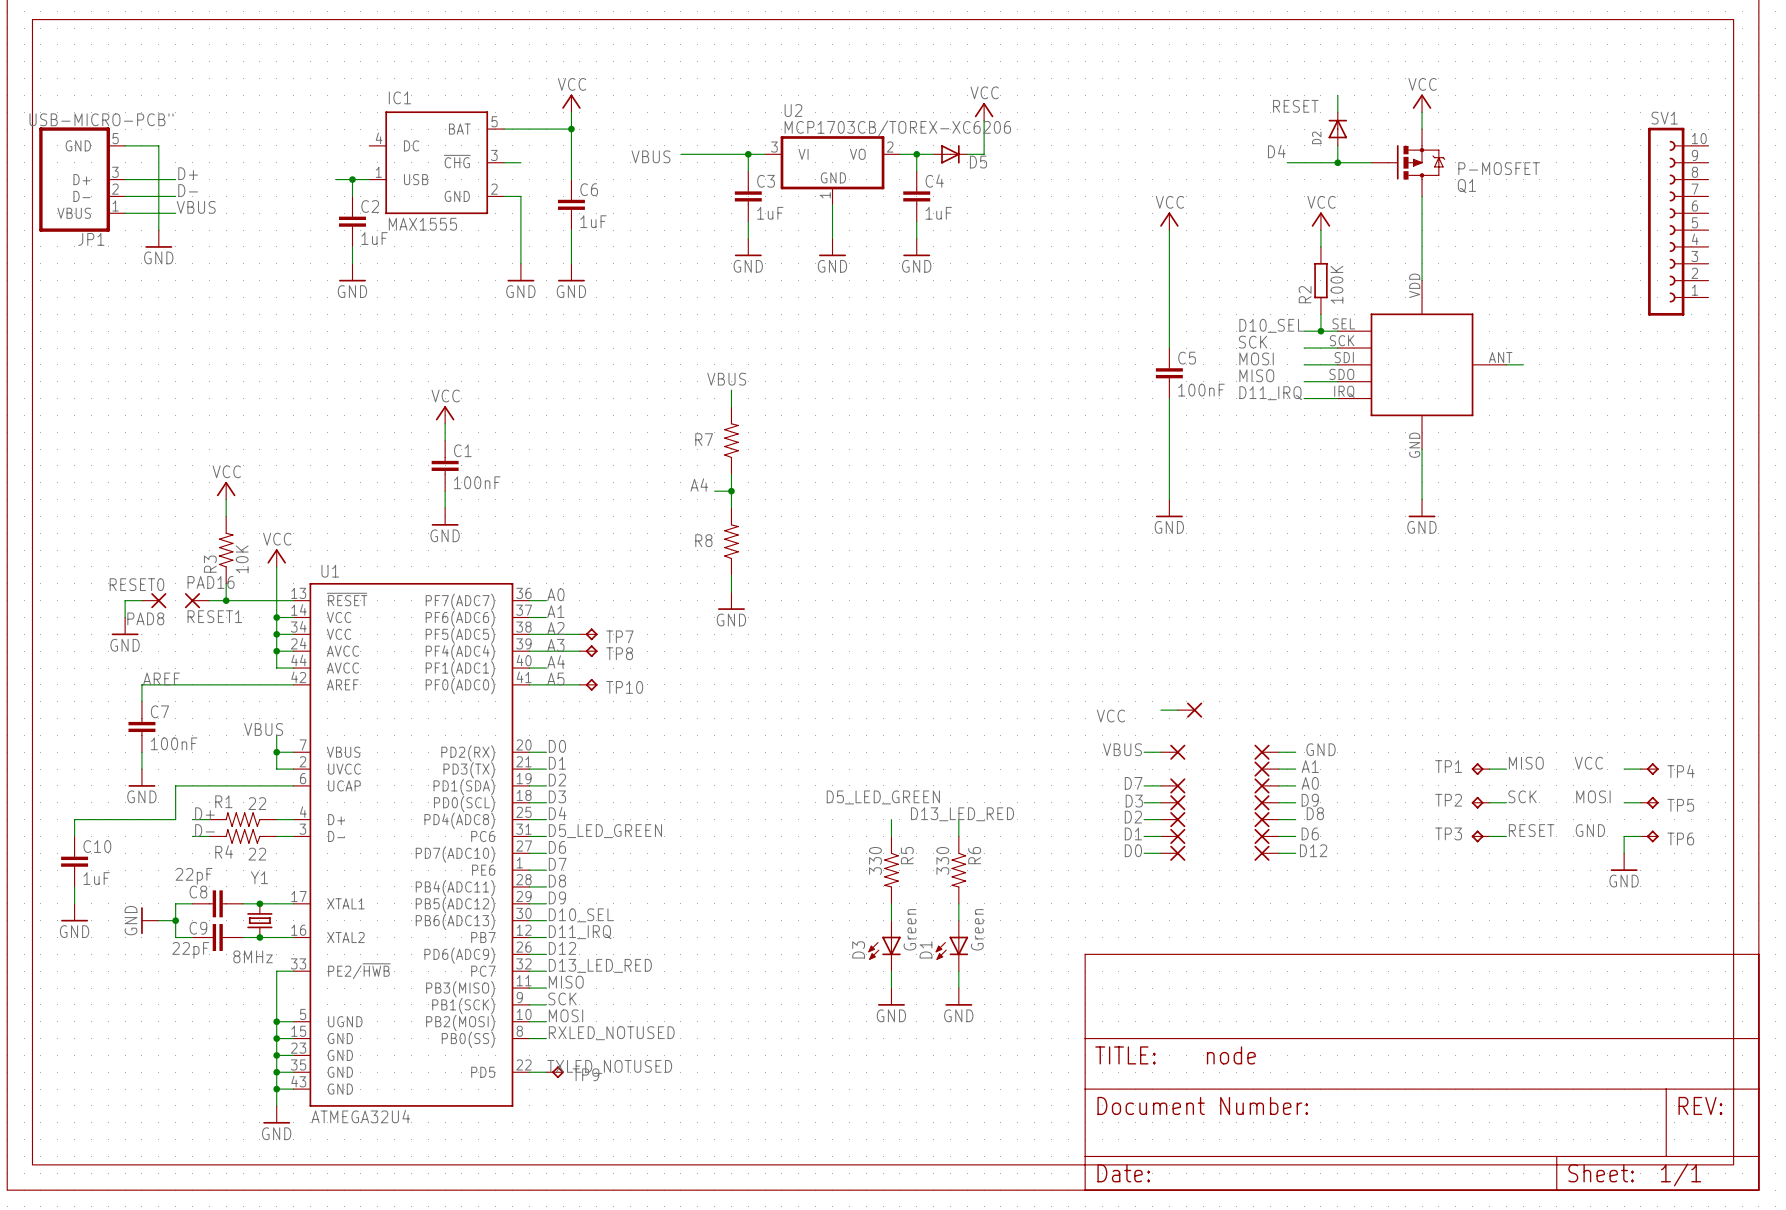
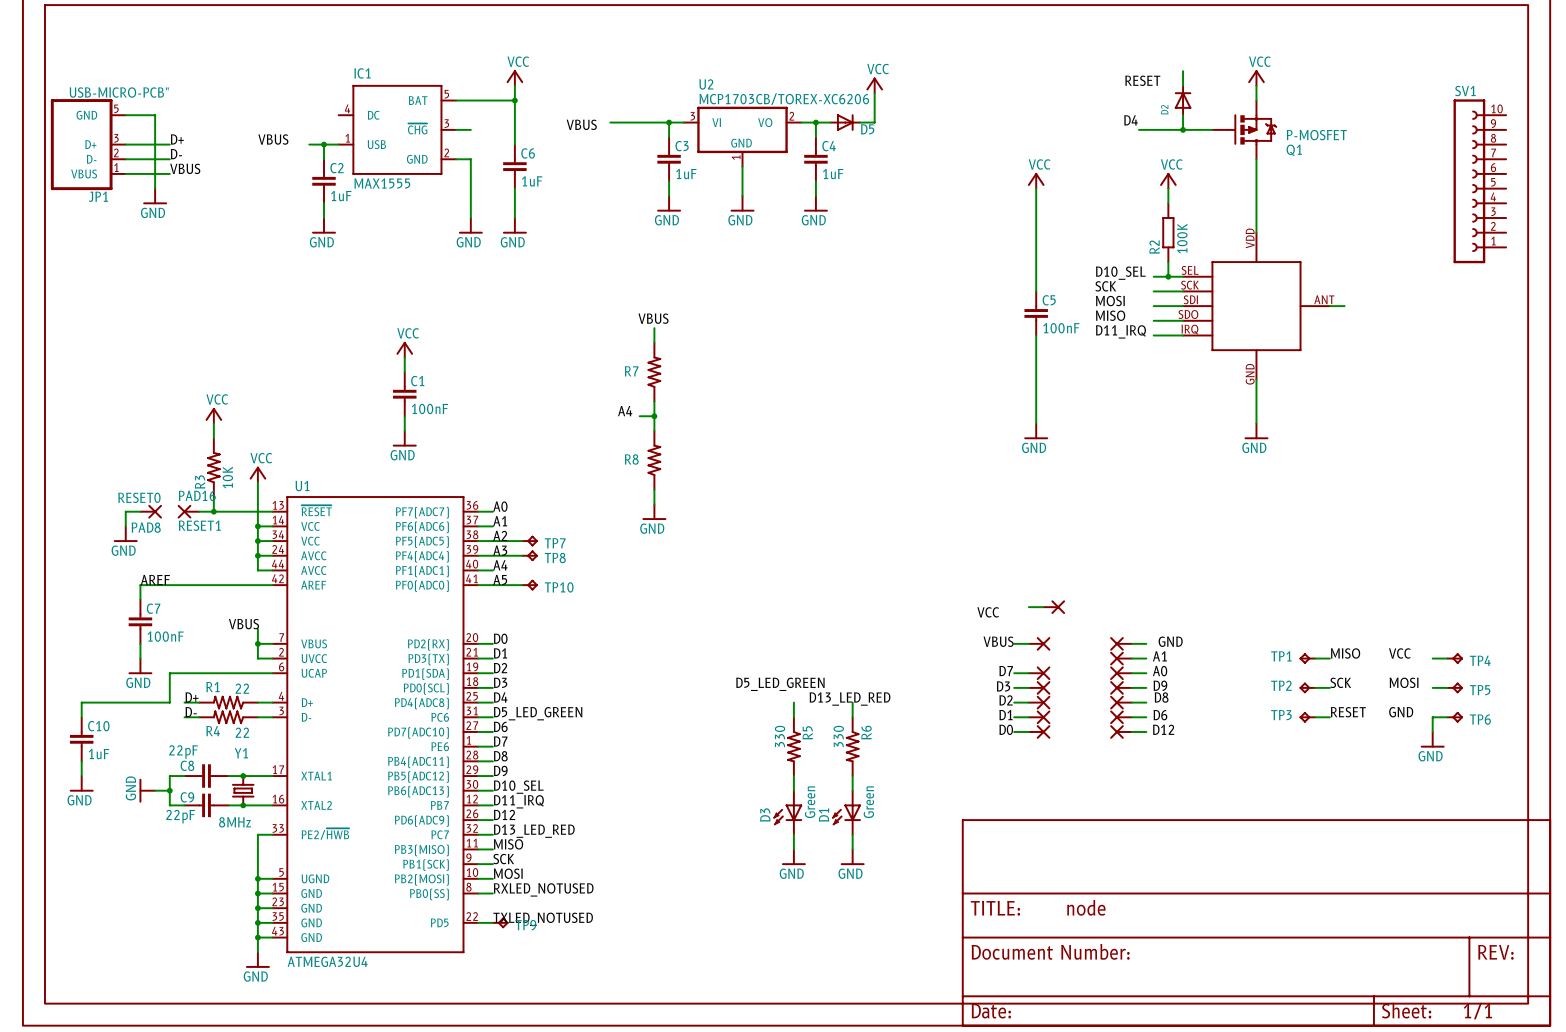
label: none -> VBUS (273, 139)

